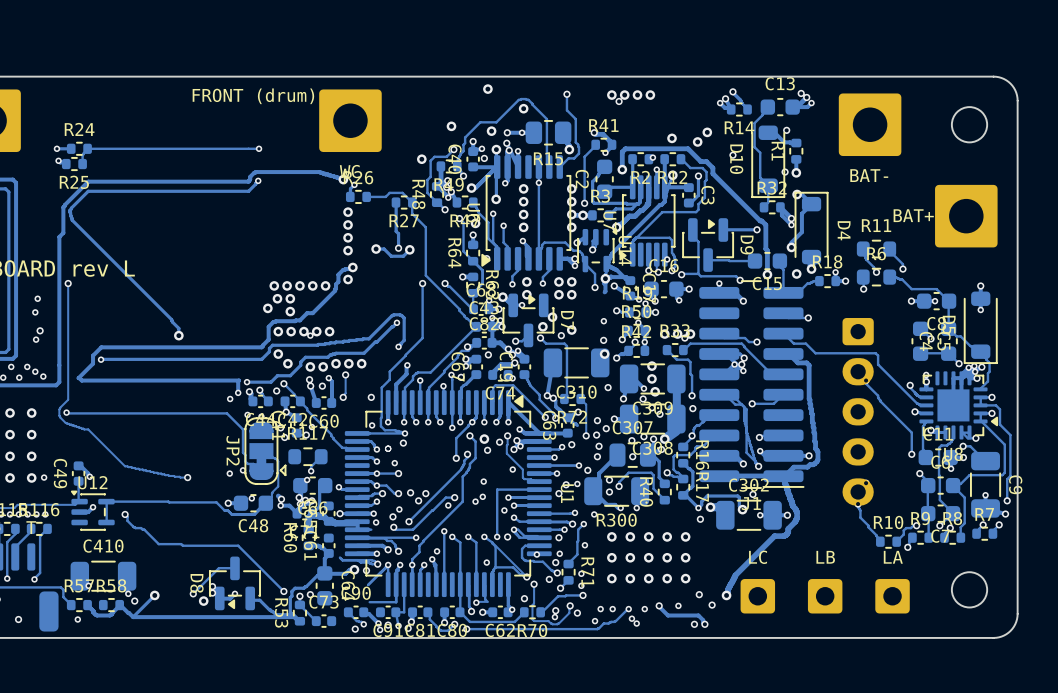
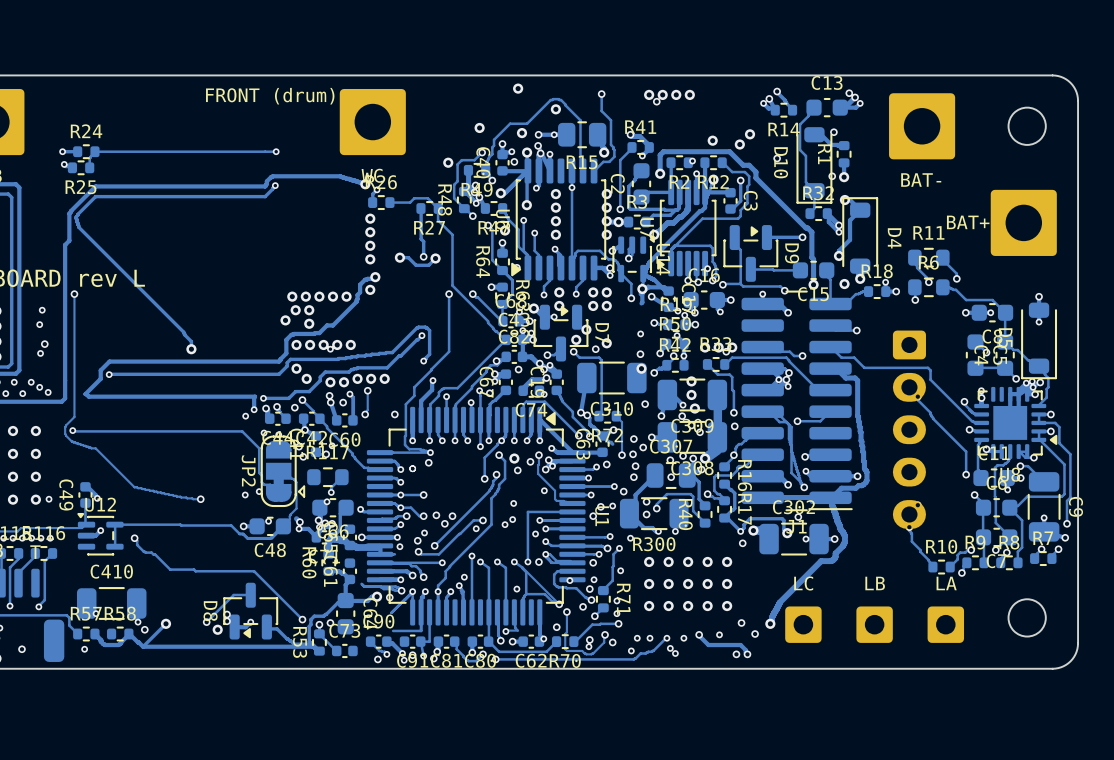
via: (372, 425) -> none
via: (394, 463) -> none

